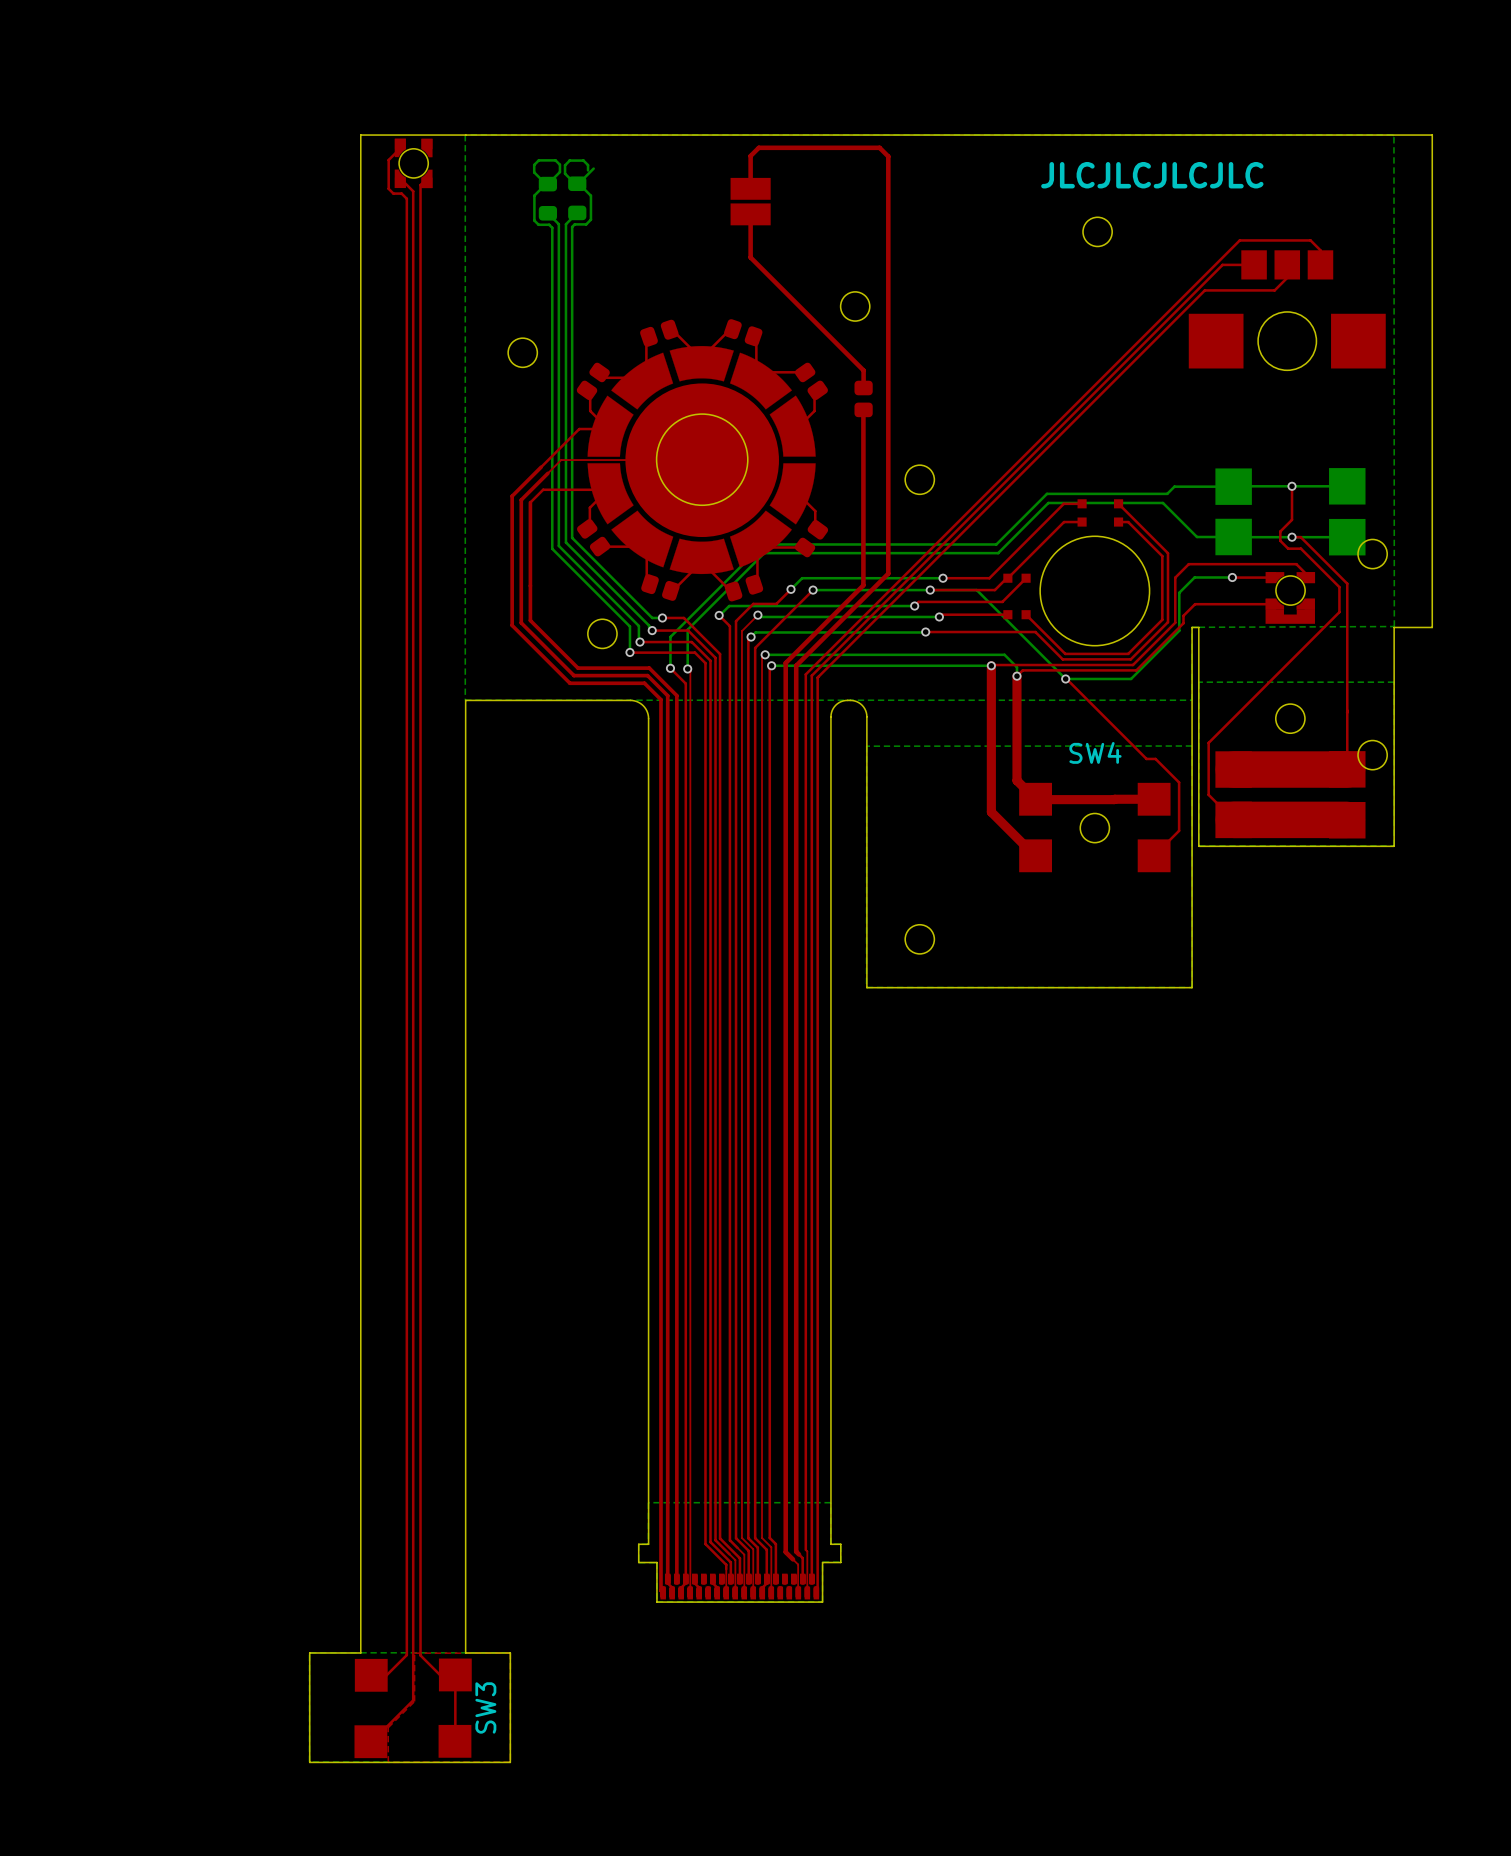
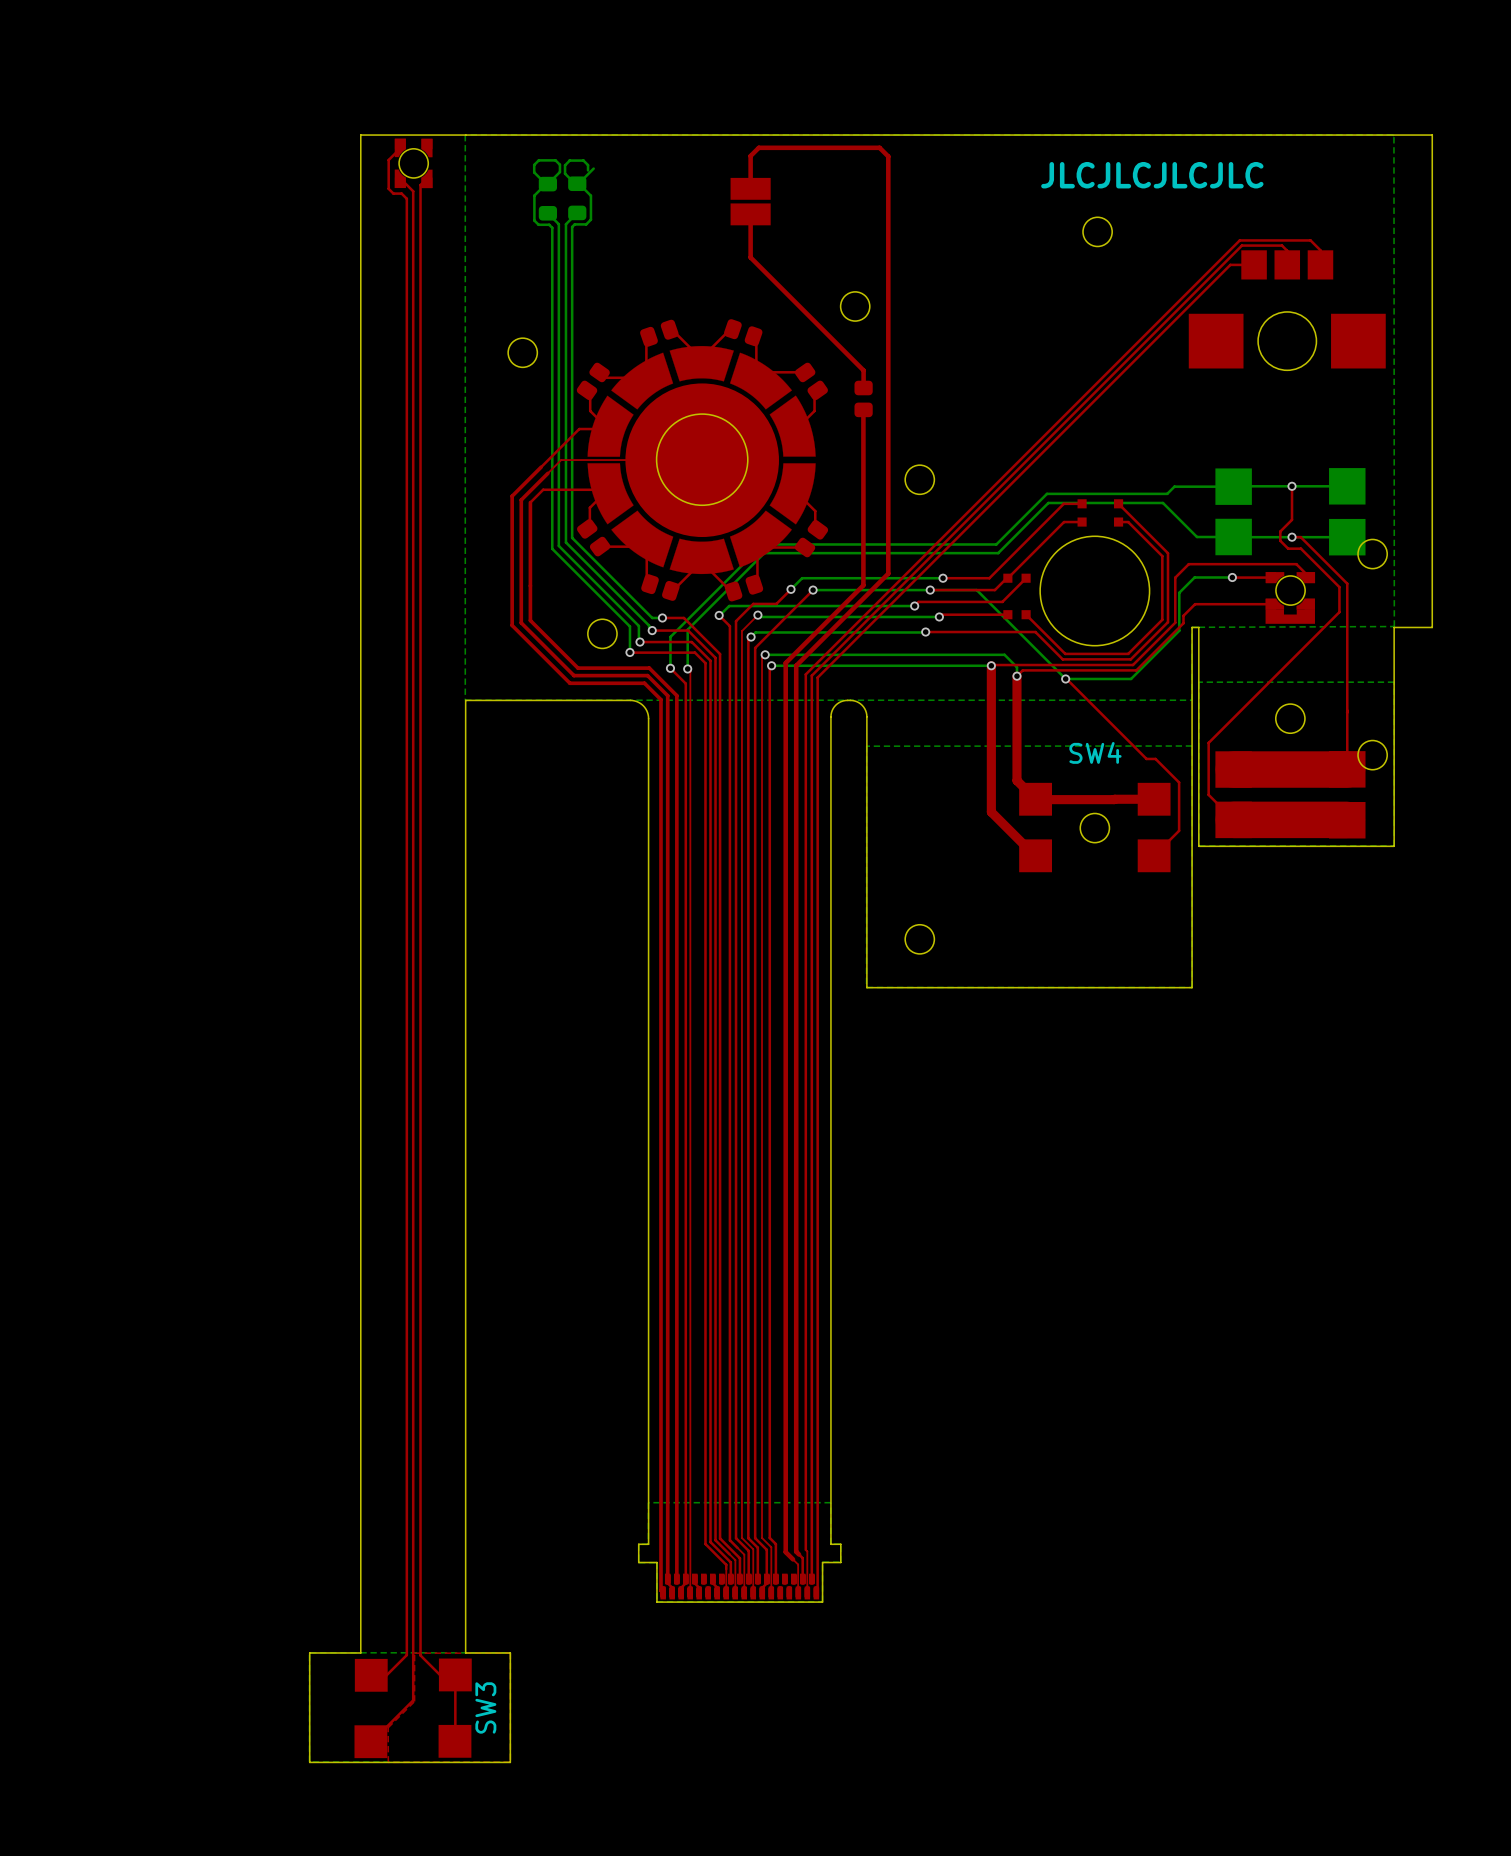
top track: (1222, 264) (1230, 264) -> (1204, 290) (1230, 264)
top track: none -> (1222, 264) (1241, 245) (1281, 245) (1287, 250) (1287, 264)
top track: (1287, 277) (1274, 290) (1204, 290) -> none

